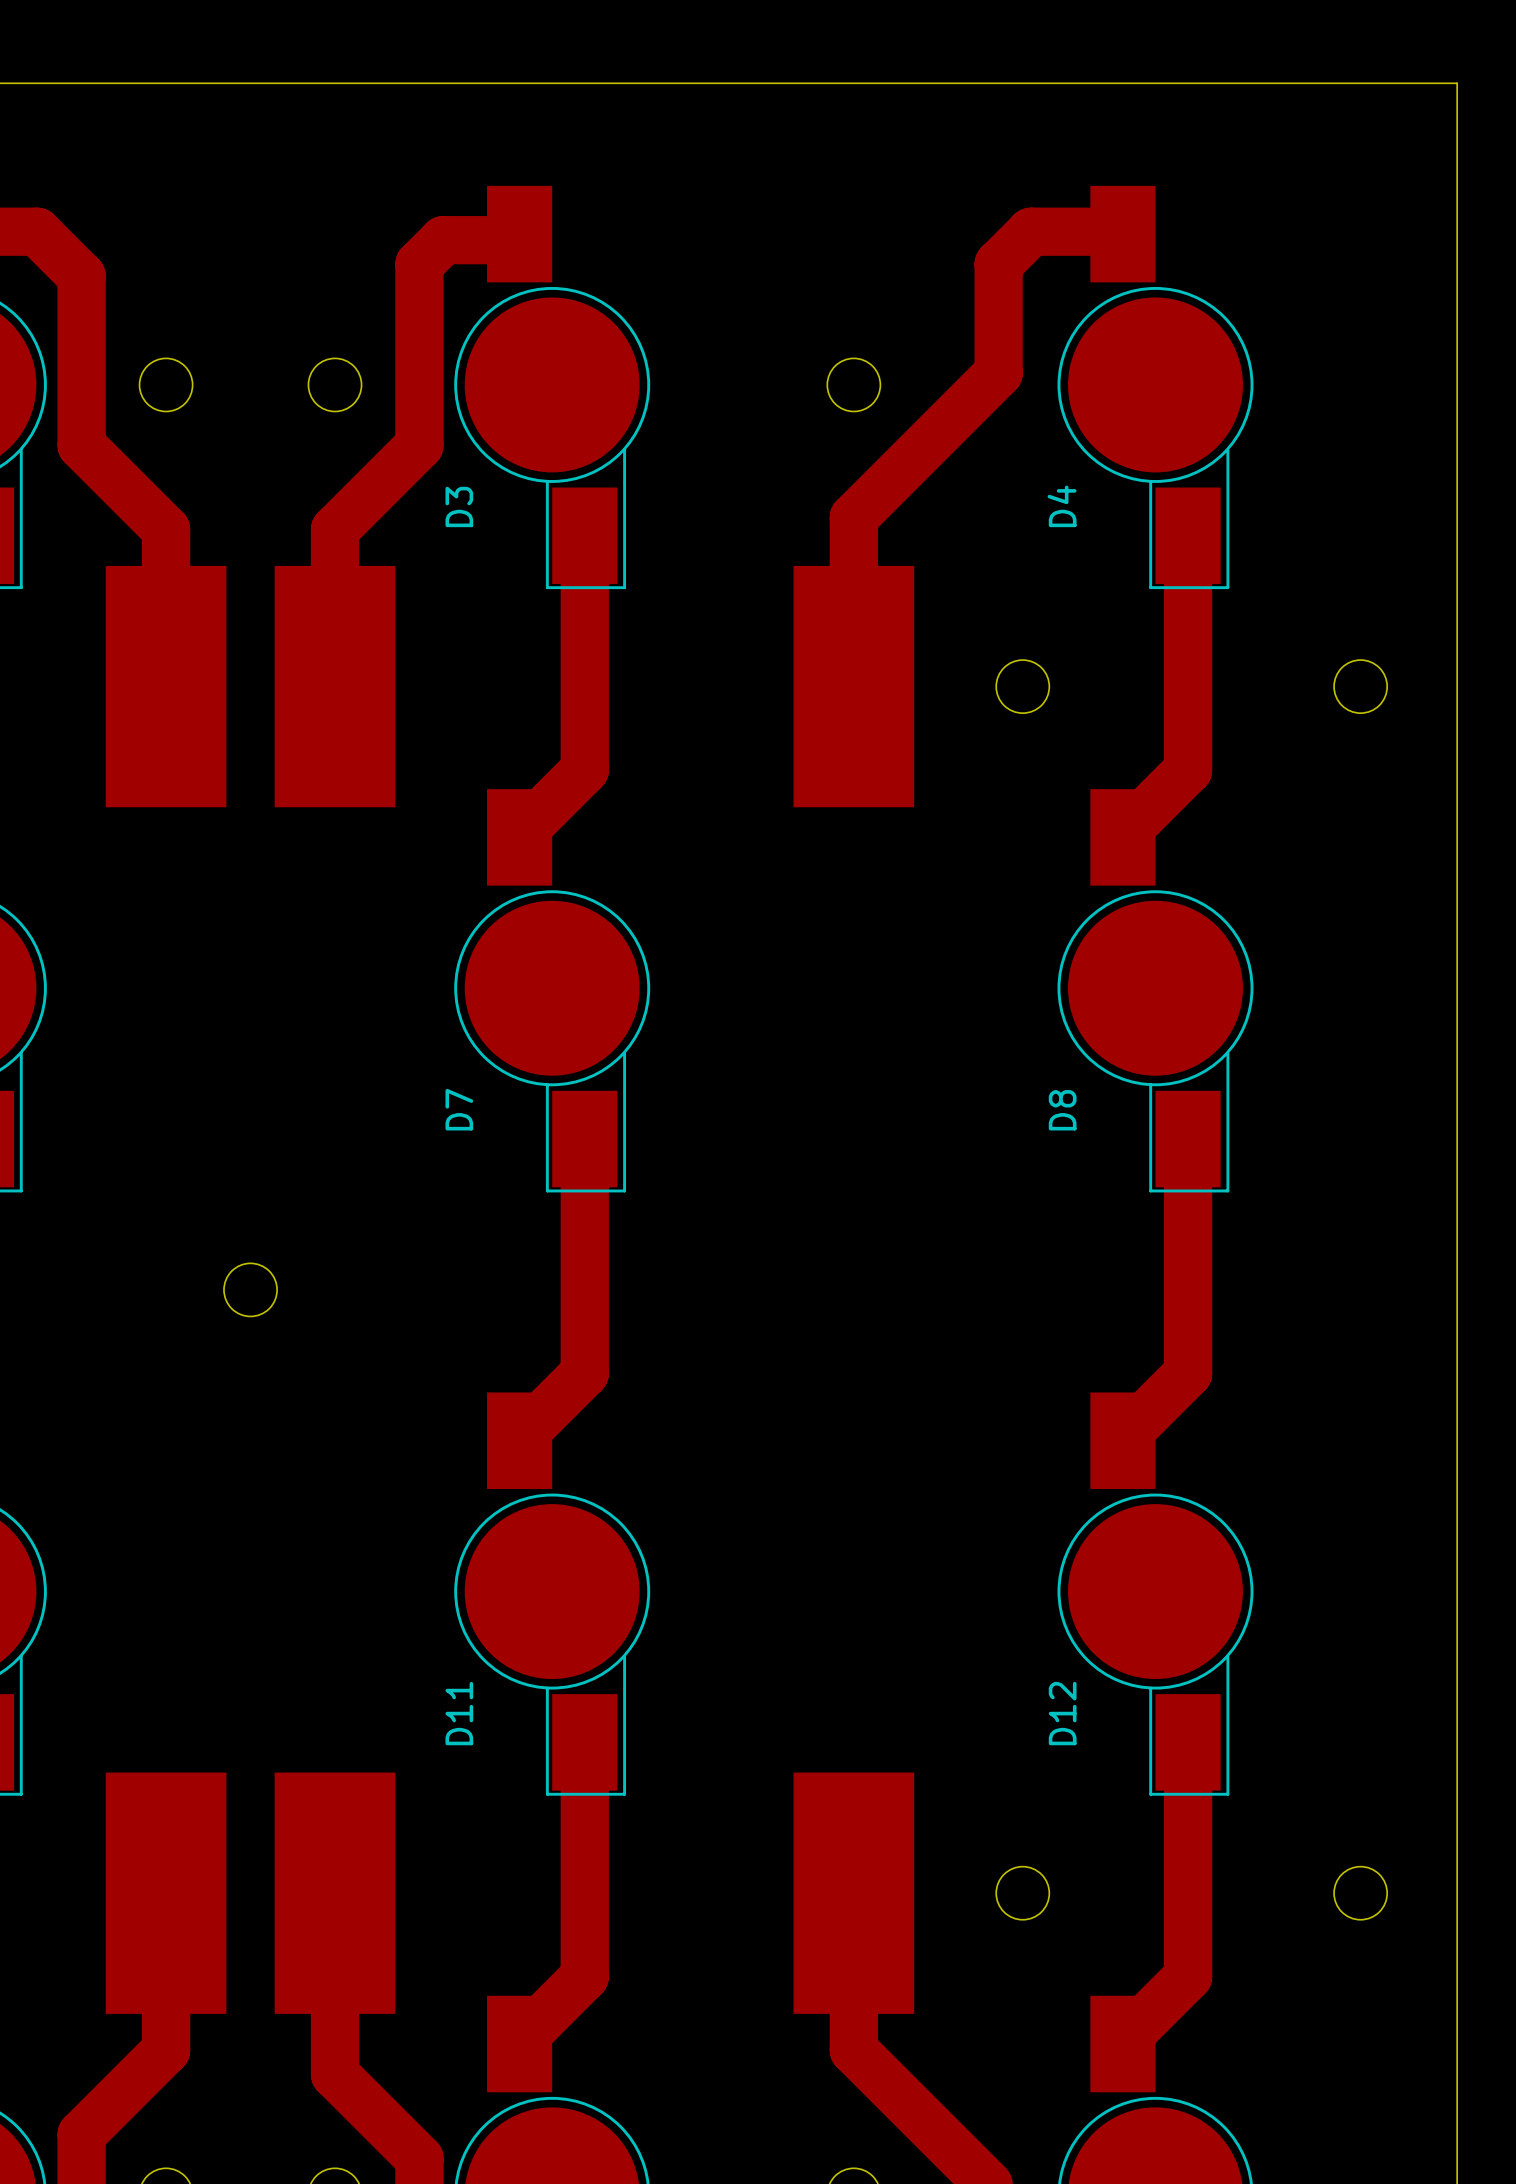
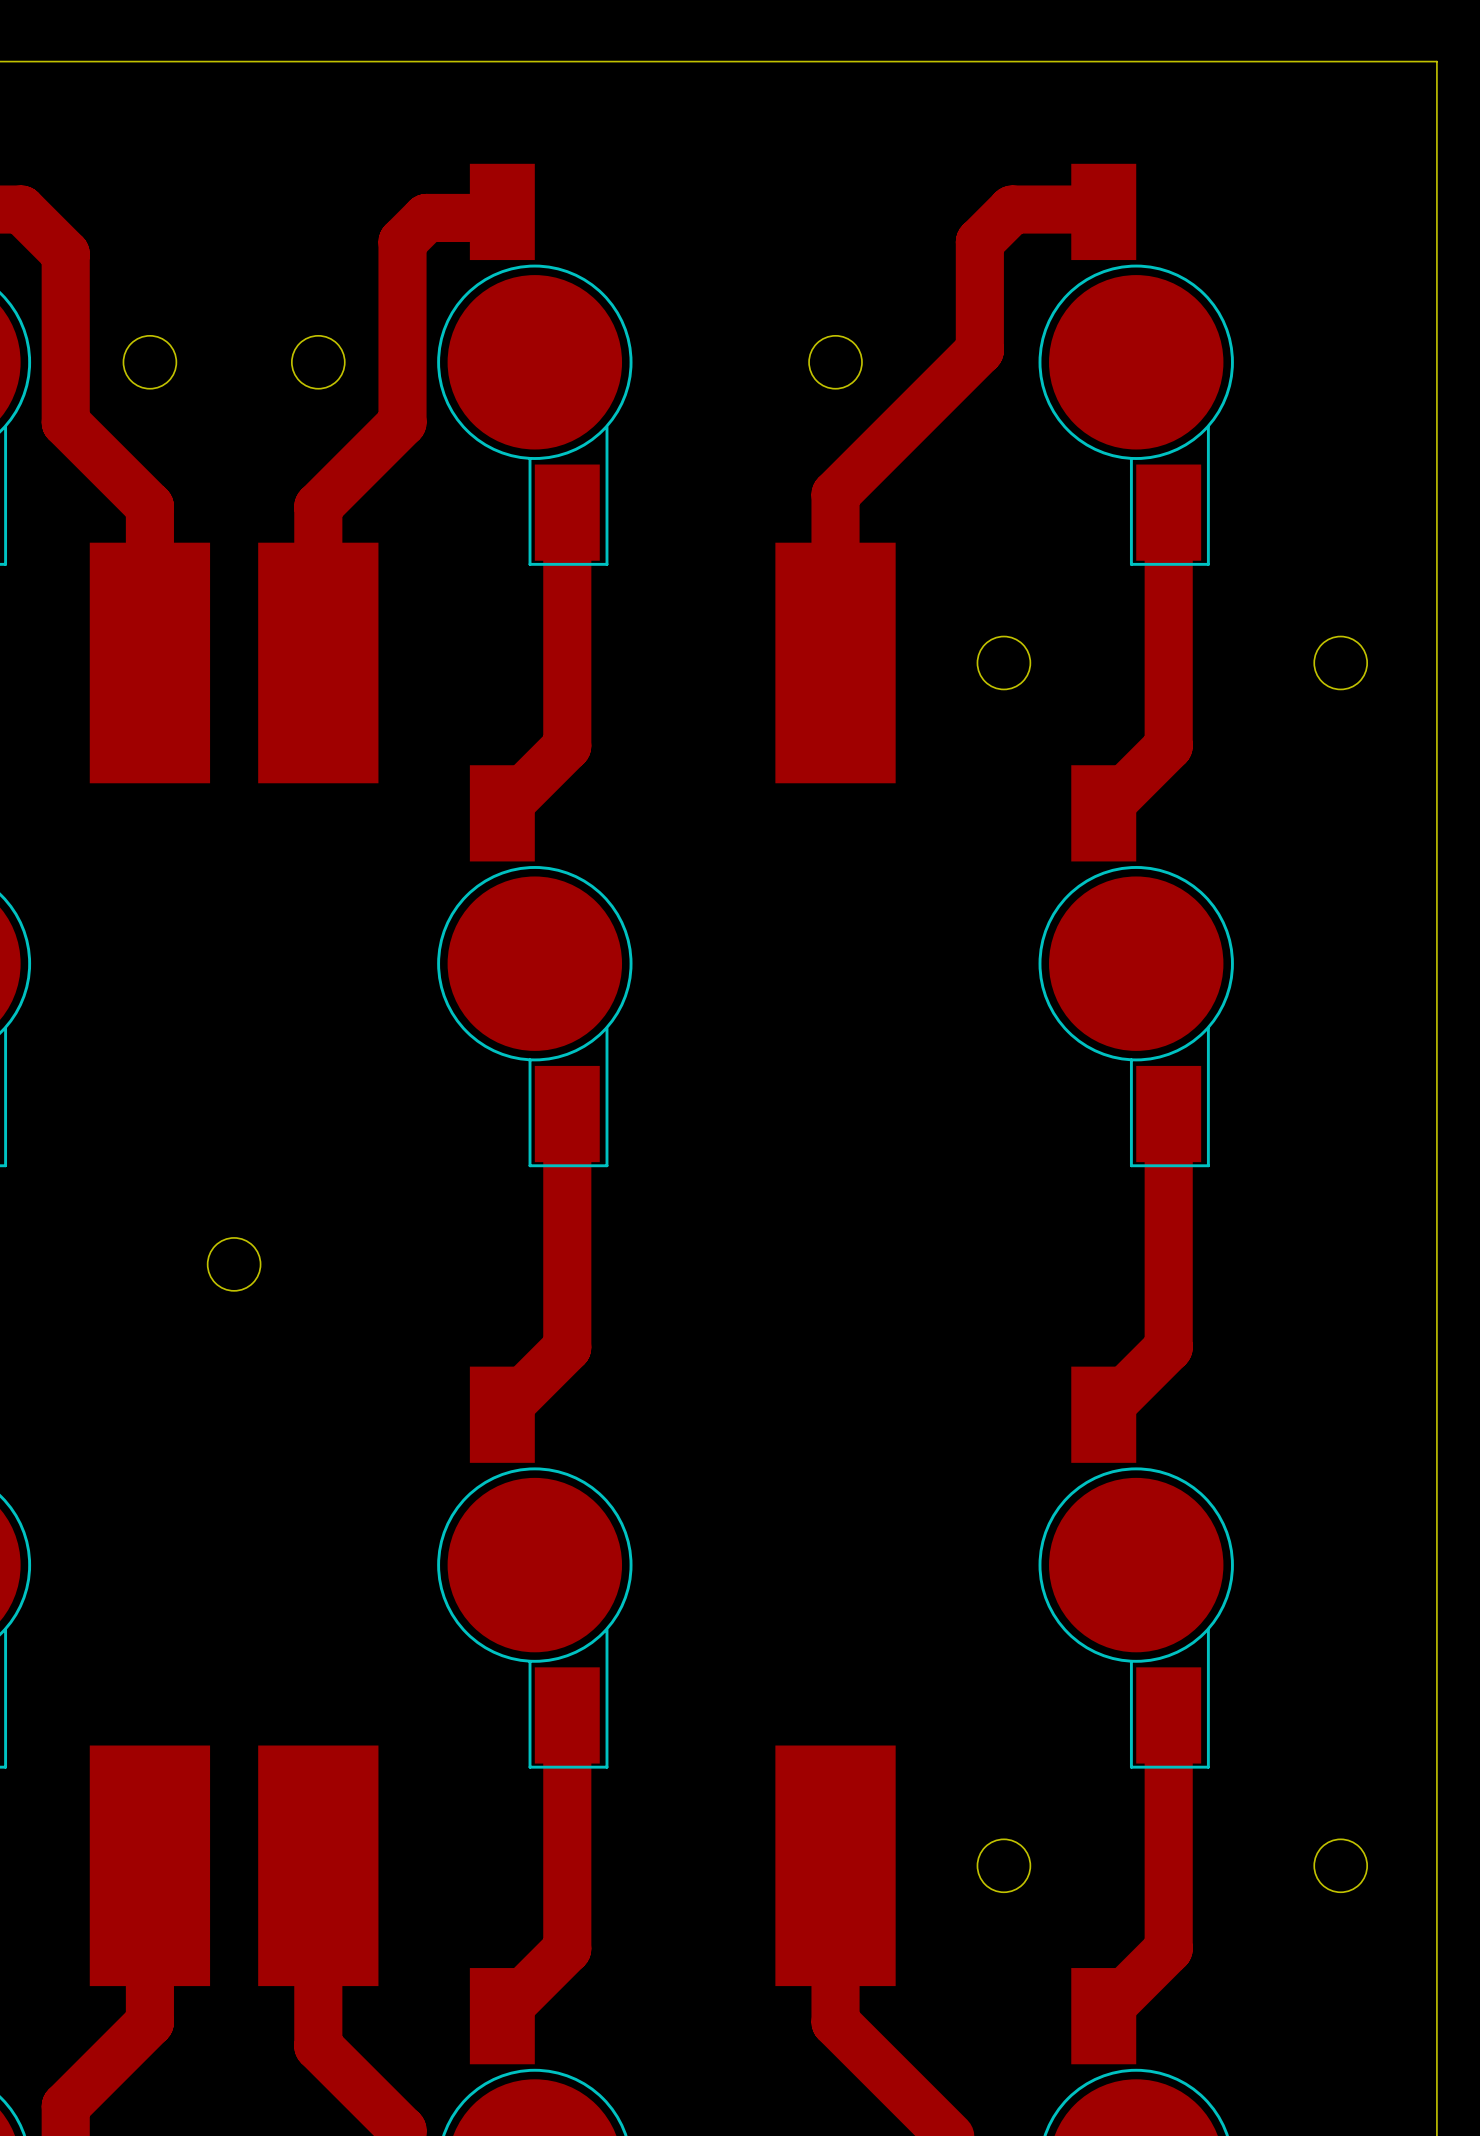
D3 name: D3 (459, 506) -> none
D4 name: D4 (1062, 506) -> none
D7 name: D7 (459, 1109) -> none
D8 name: D8 (1062, 1110) -> none
D11 name: D11 (459, 1713) -> none
D12 name: D12 (1062, 1713) -> none

